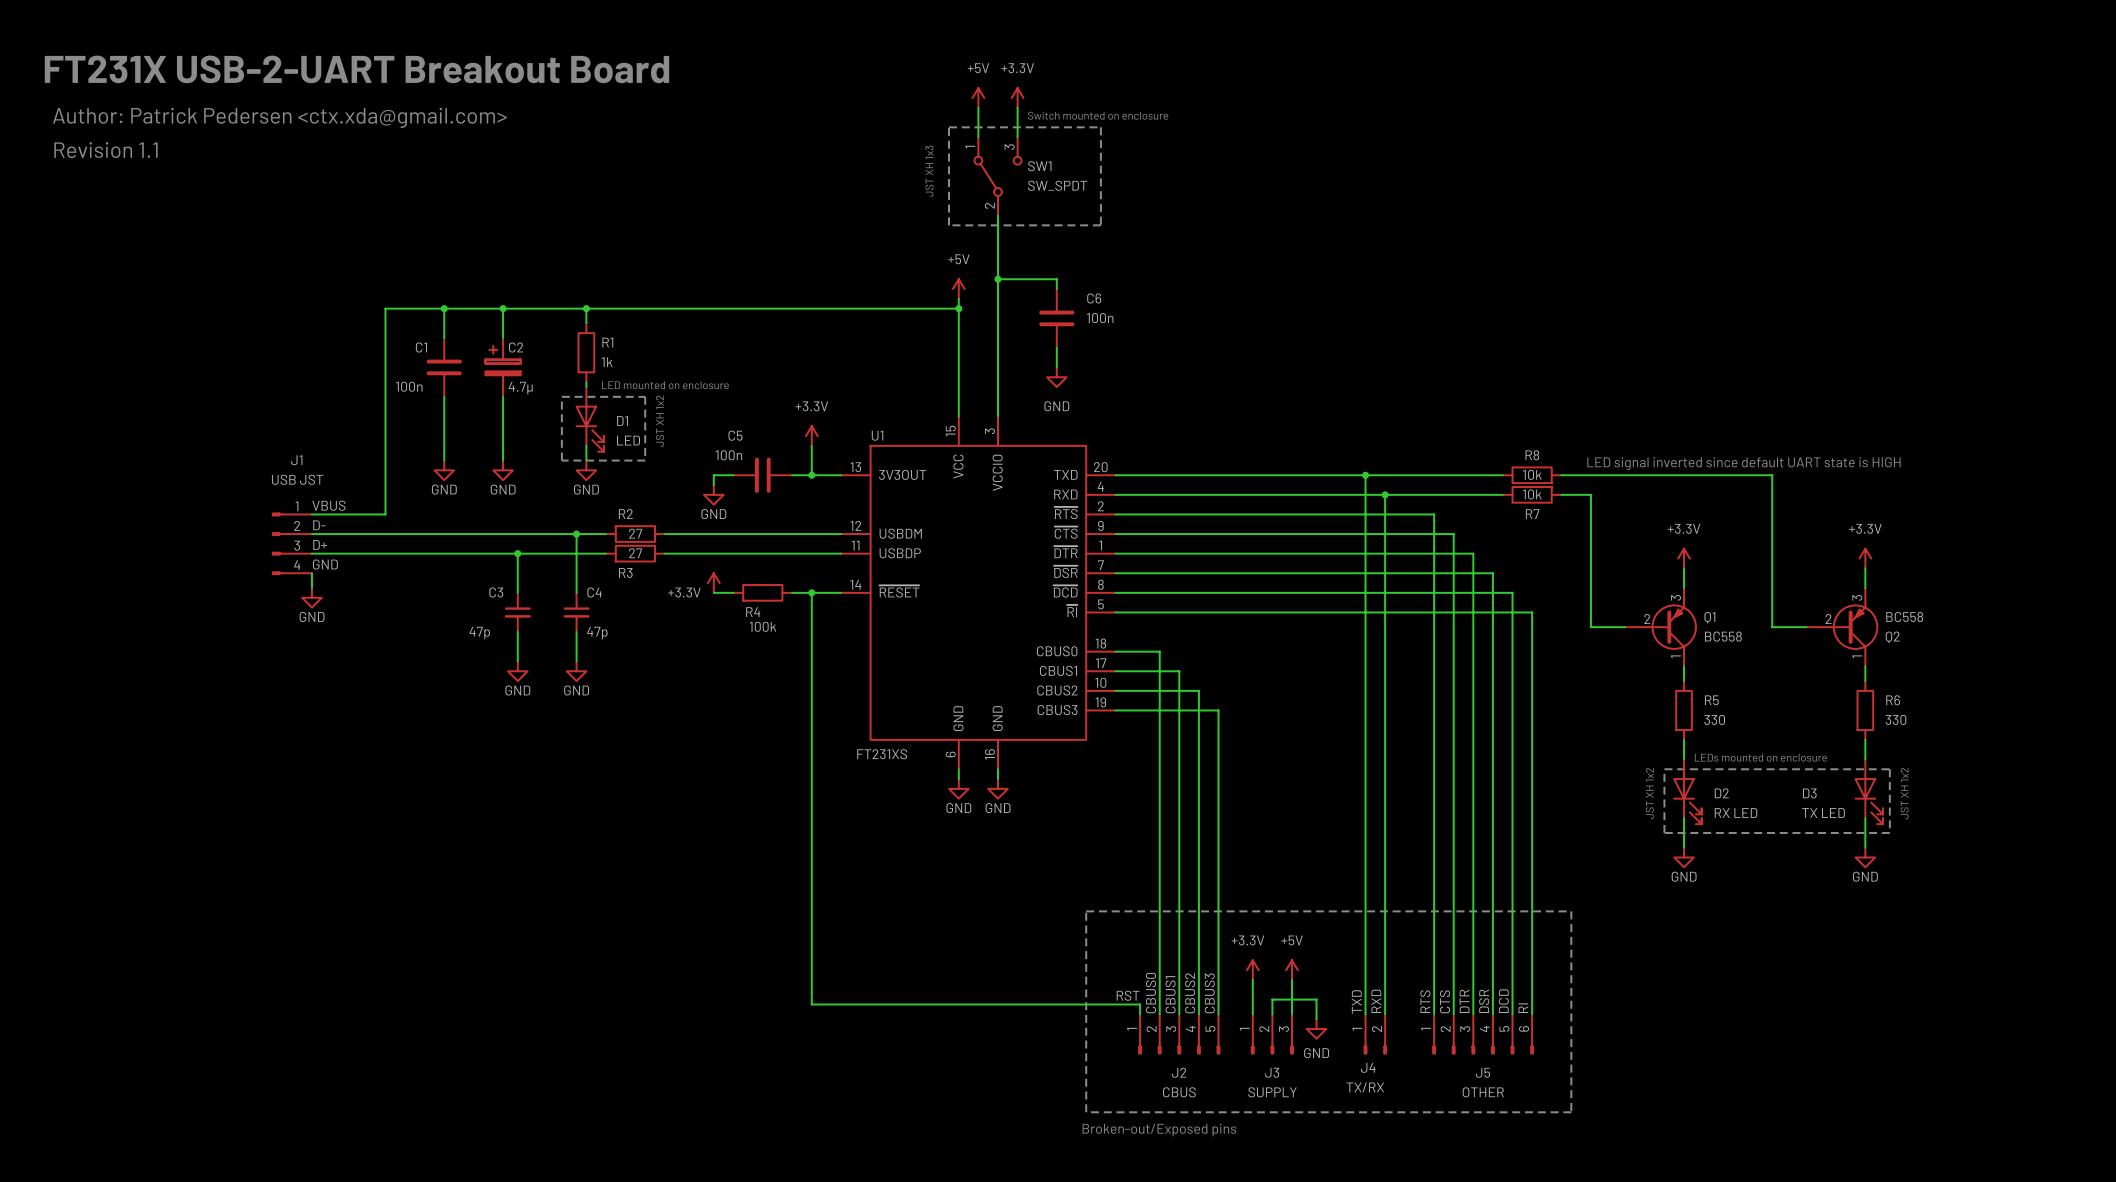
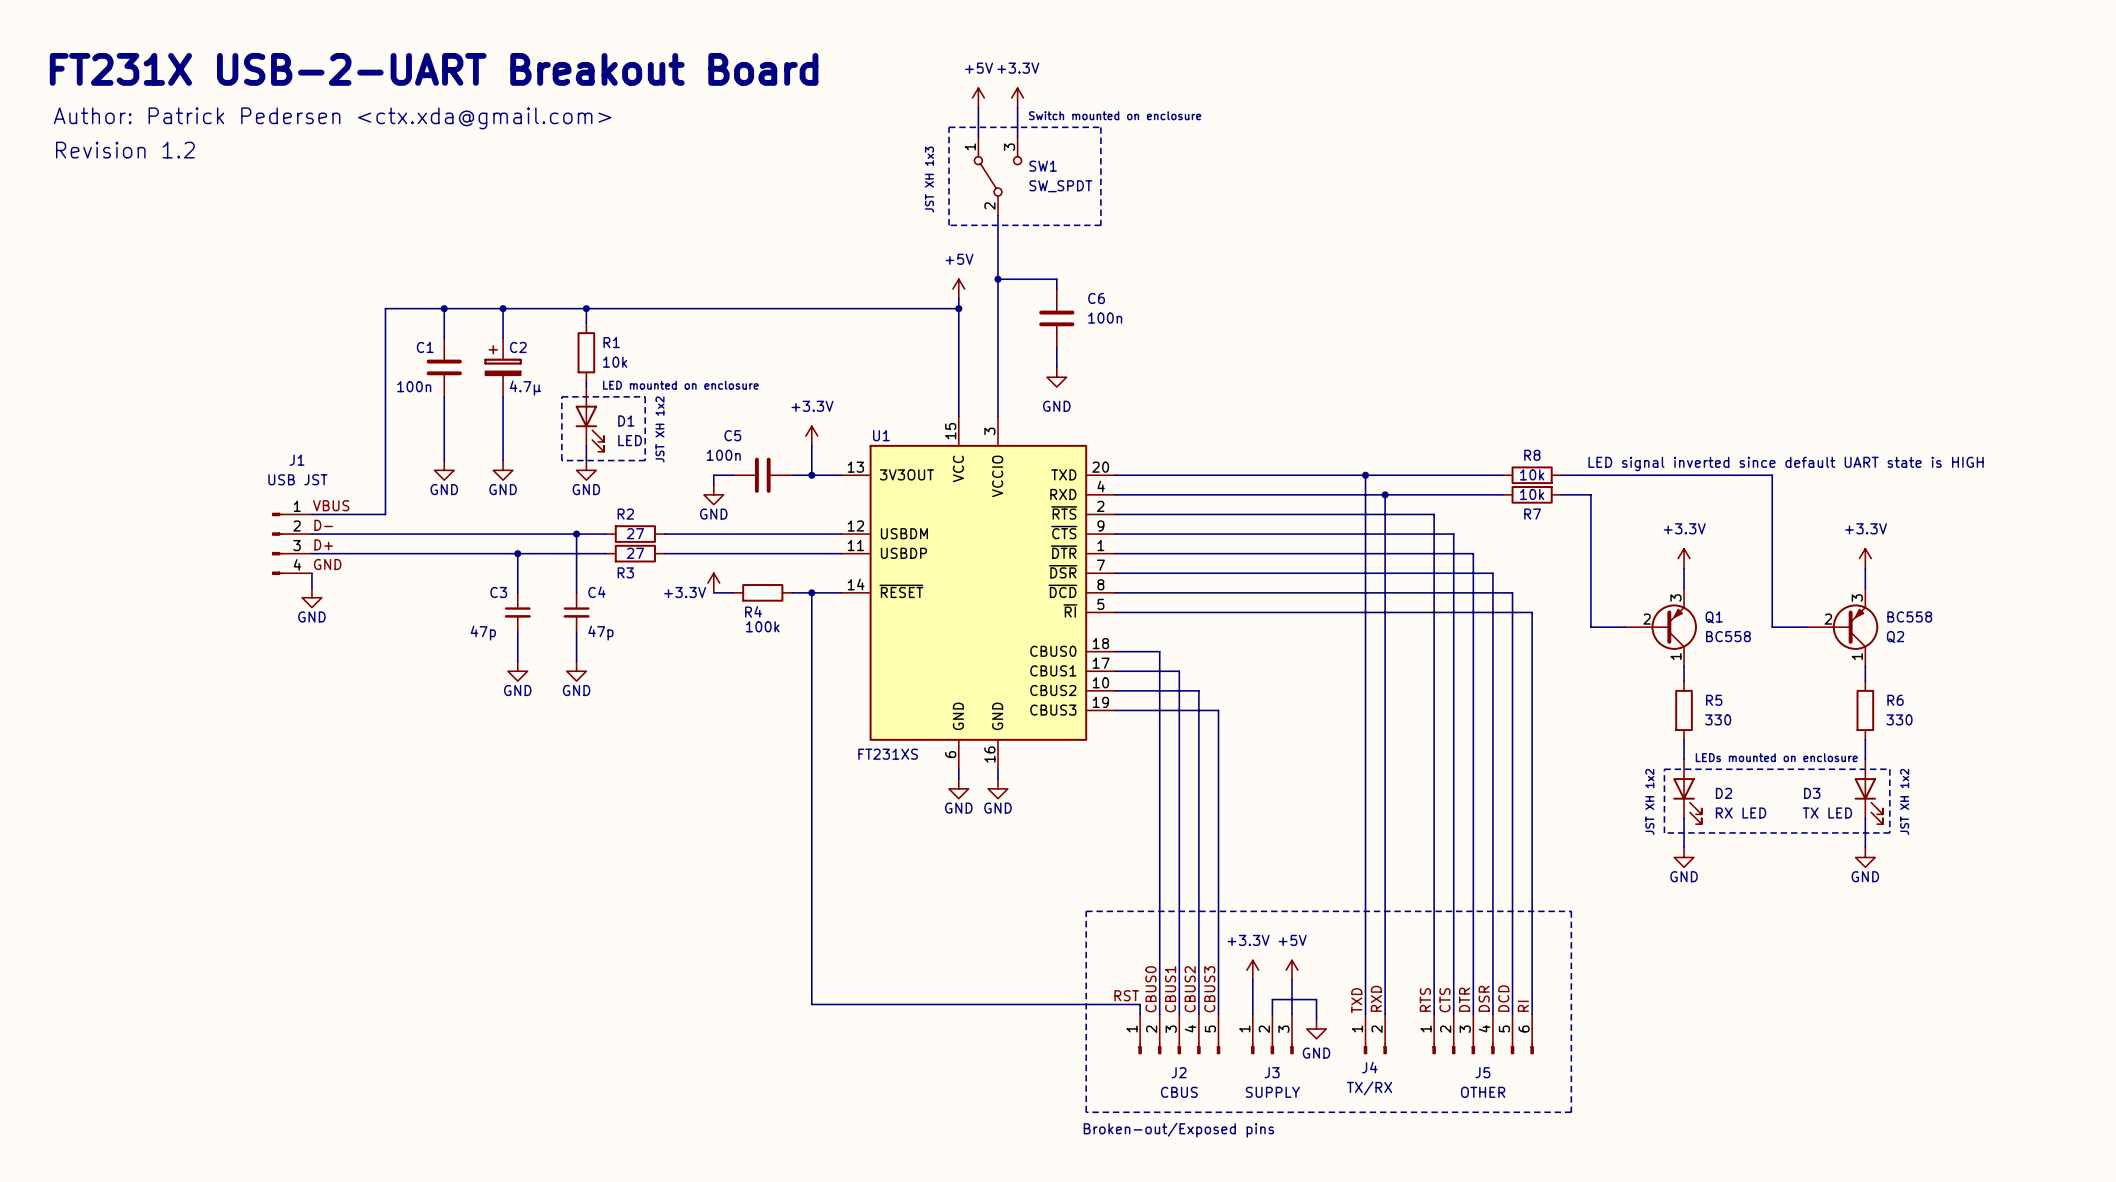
text: Revision 1.1 (105, 150) -> Revision 1.2 (125, 150)
R1 value: 1k (607, 362) -> 10k (615, 362)

